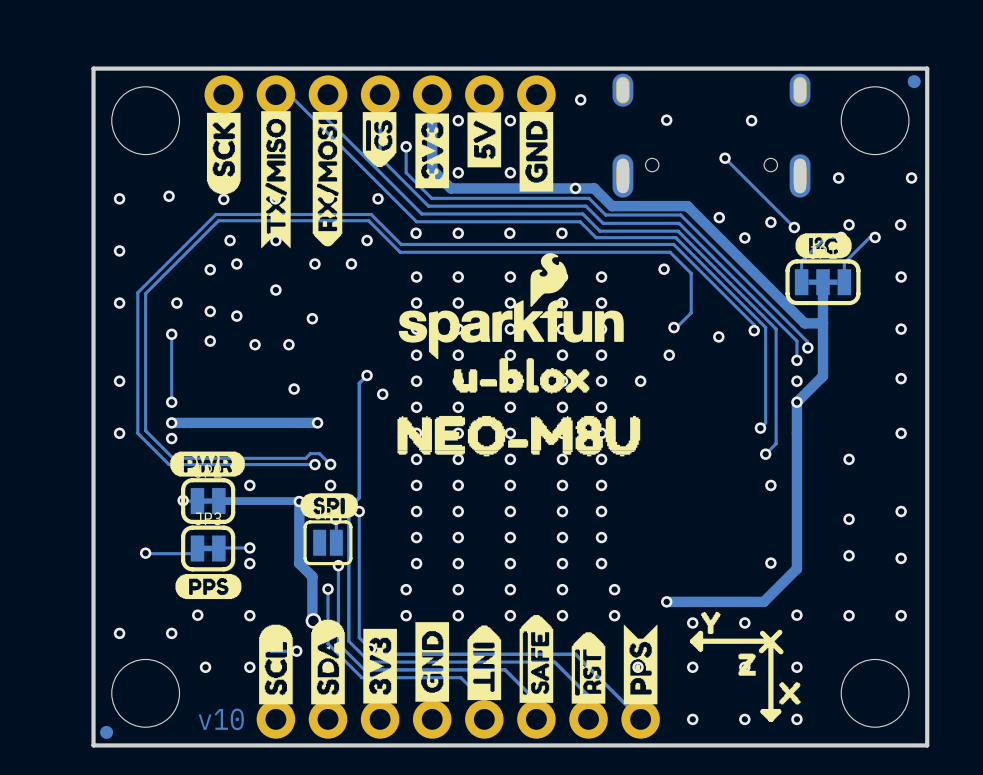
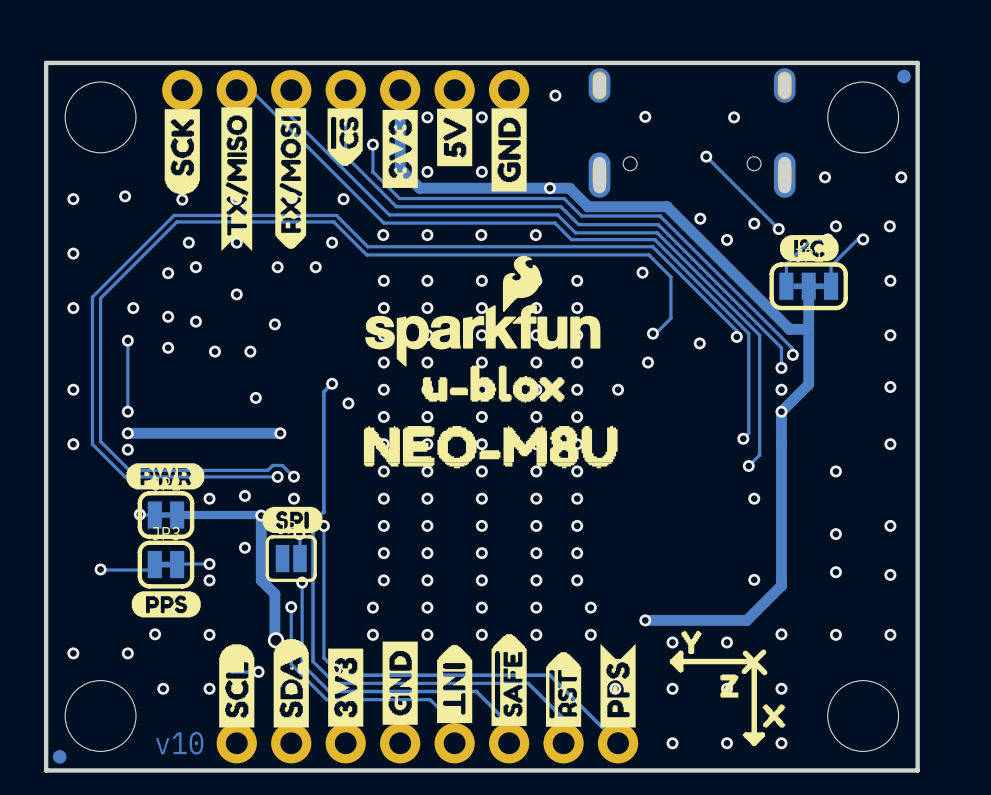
via: none -> (244, 495)
via: none -> (244, 547)

